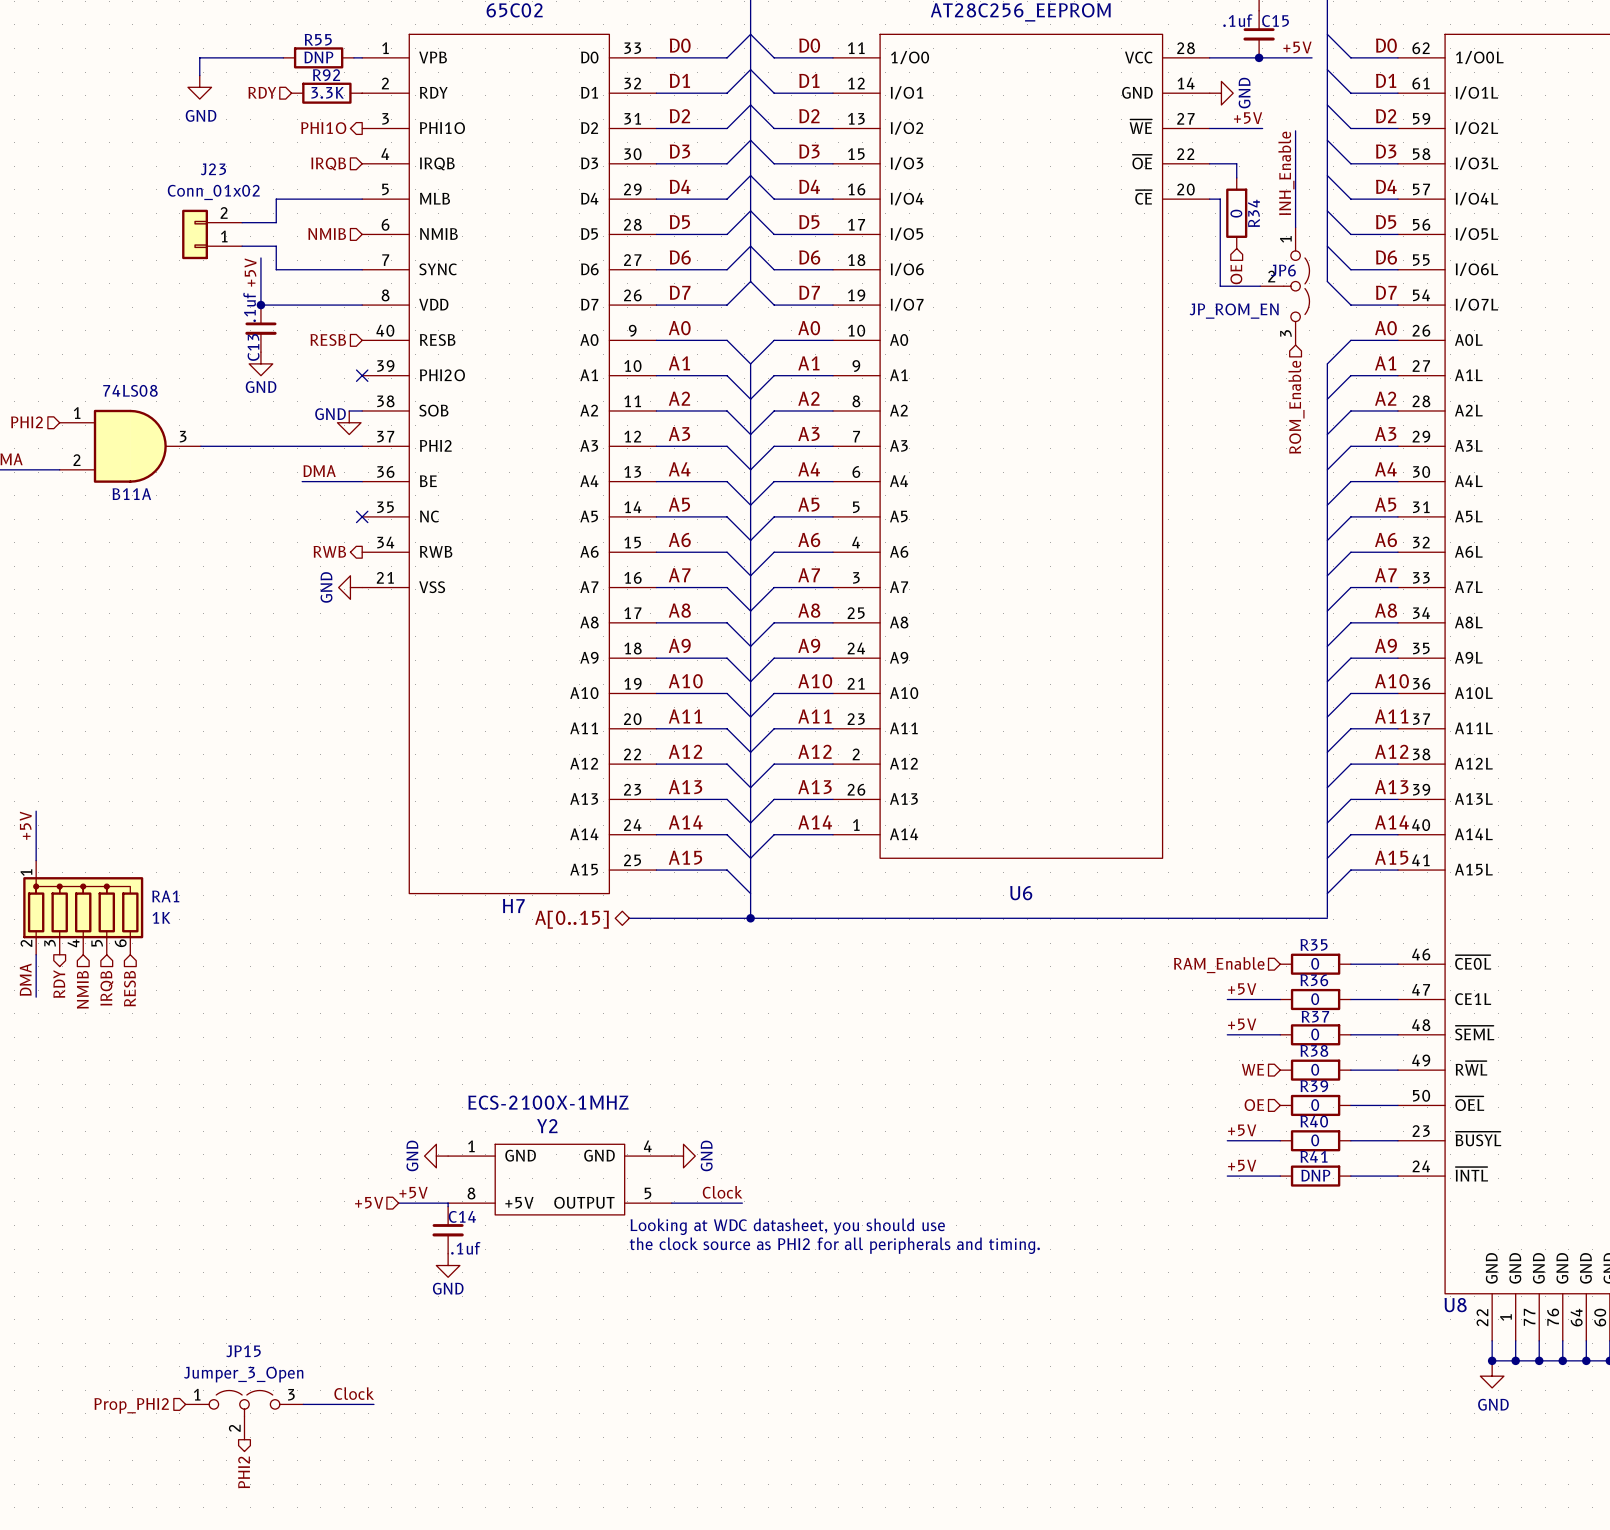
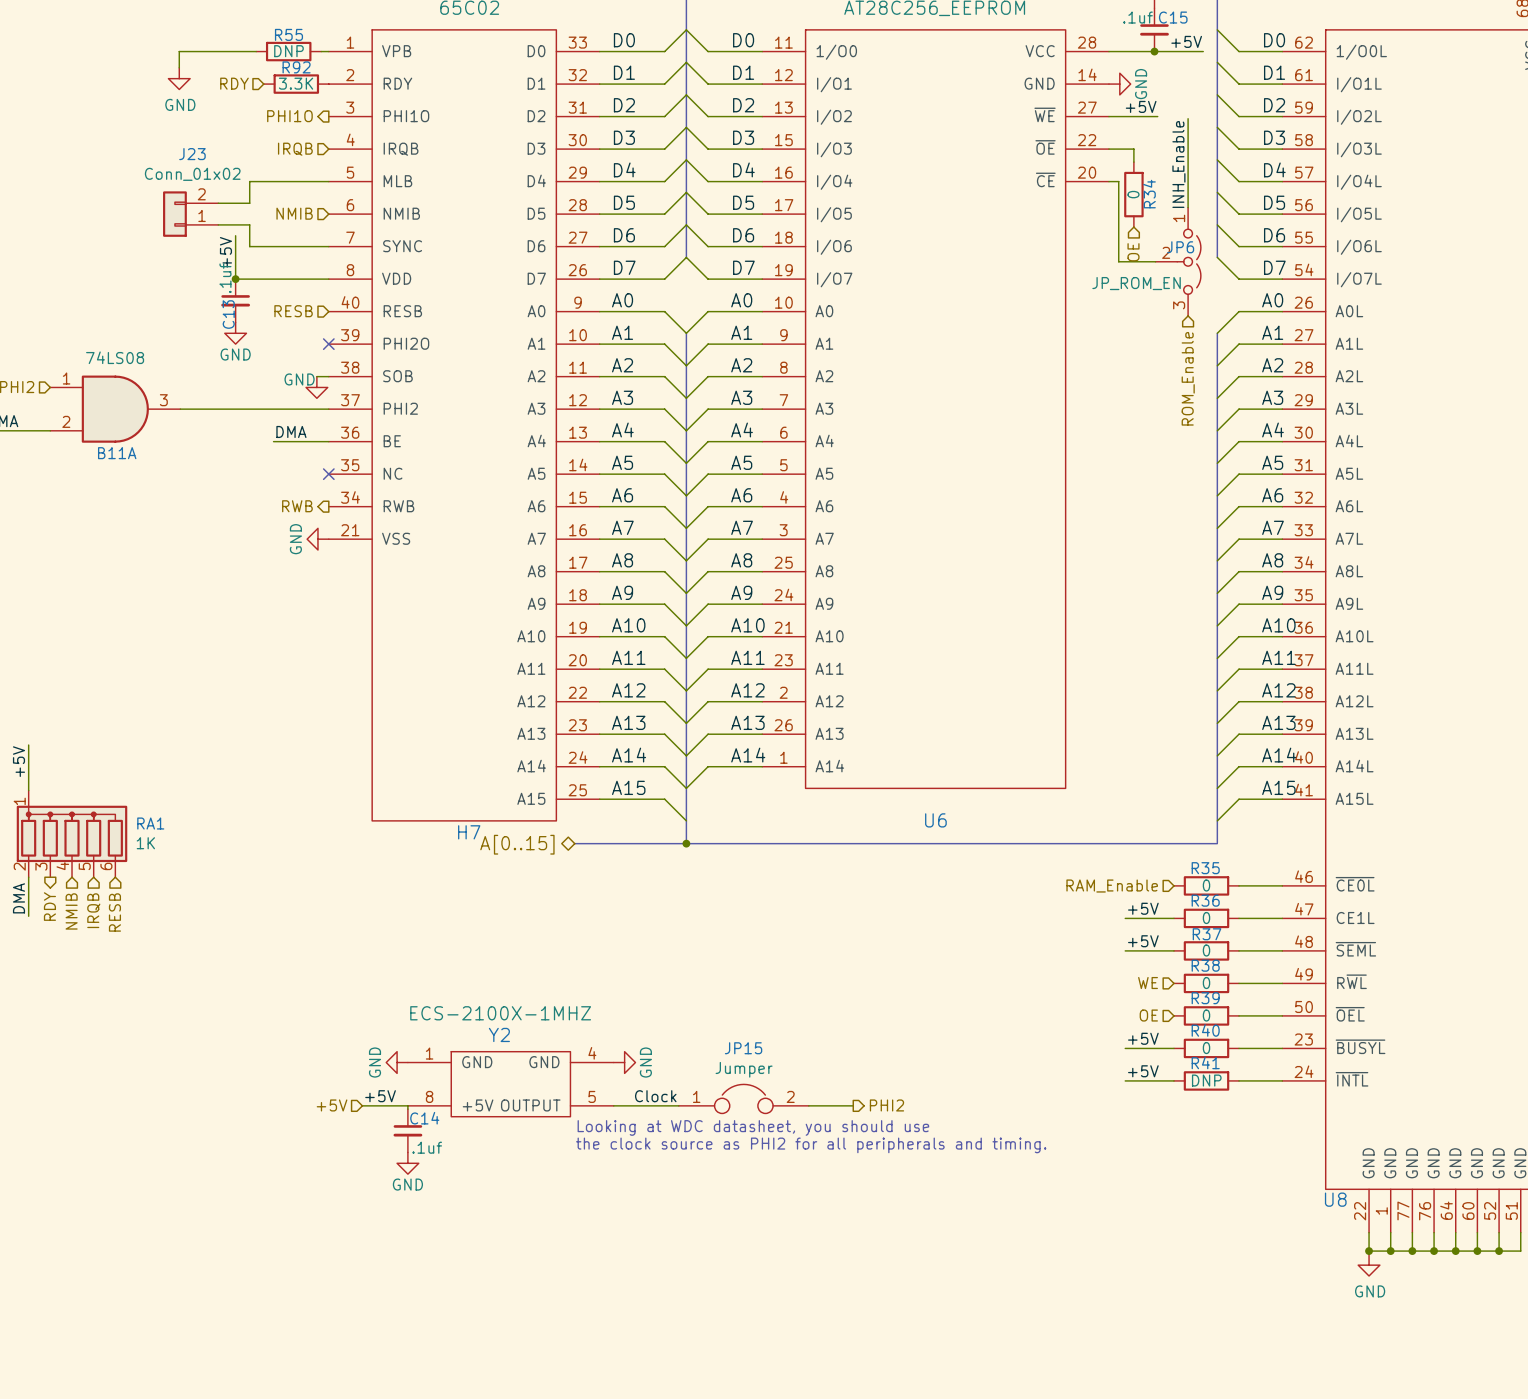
hierarchical label: none -> PHI2 (886, 1105)
wire: none -> (808, 1105) (853, 1105)
JP15 value: Jumper_3_Open (243, 1374) -> Jumper (744, 1069)
JP15 symbol: [185, 1390, 304, 1440] -> [678, 1084, 809, 1114]
label: Clock (354, 1393) -> none
wire: (303, 1404) (373, 1404) -> none
hierarchical label: Prop_PHI2 (131, 1405) -> none
hierarchical label: PHI2 (244, 1472) -> none

